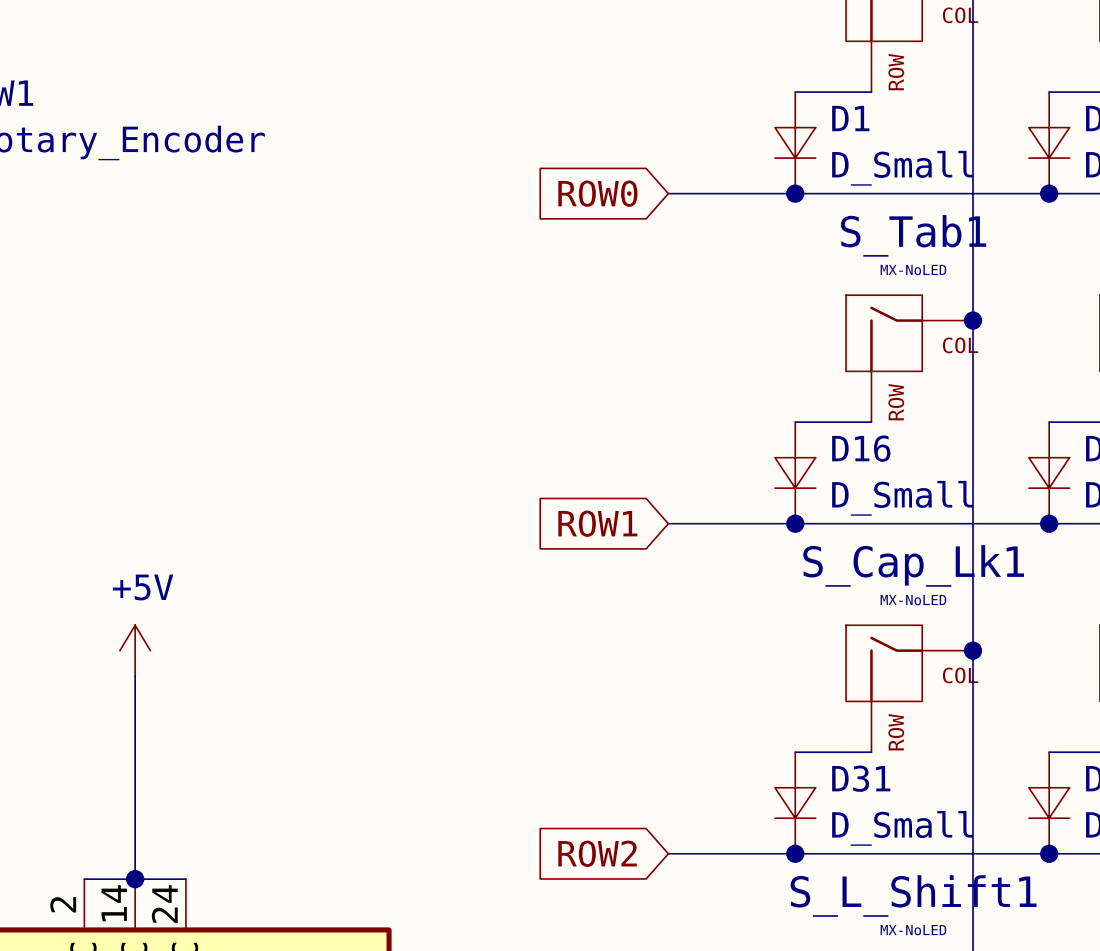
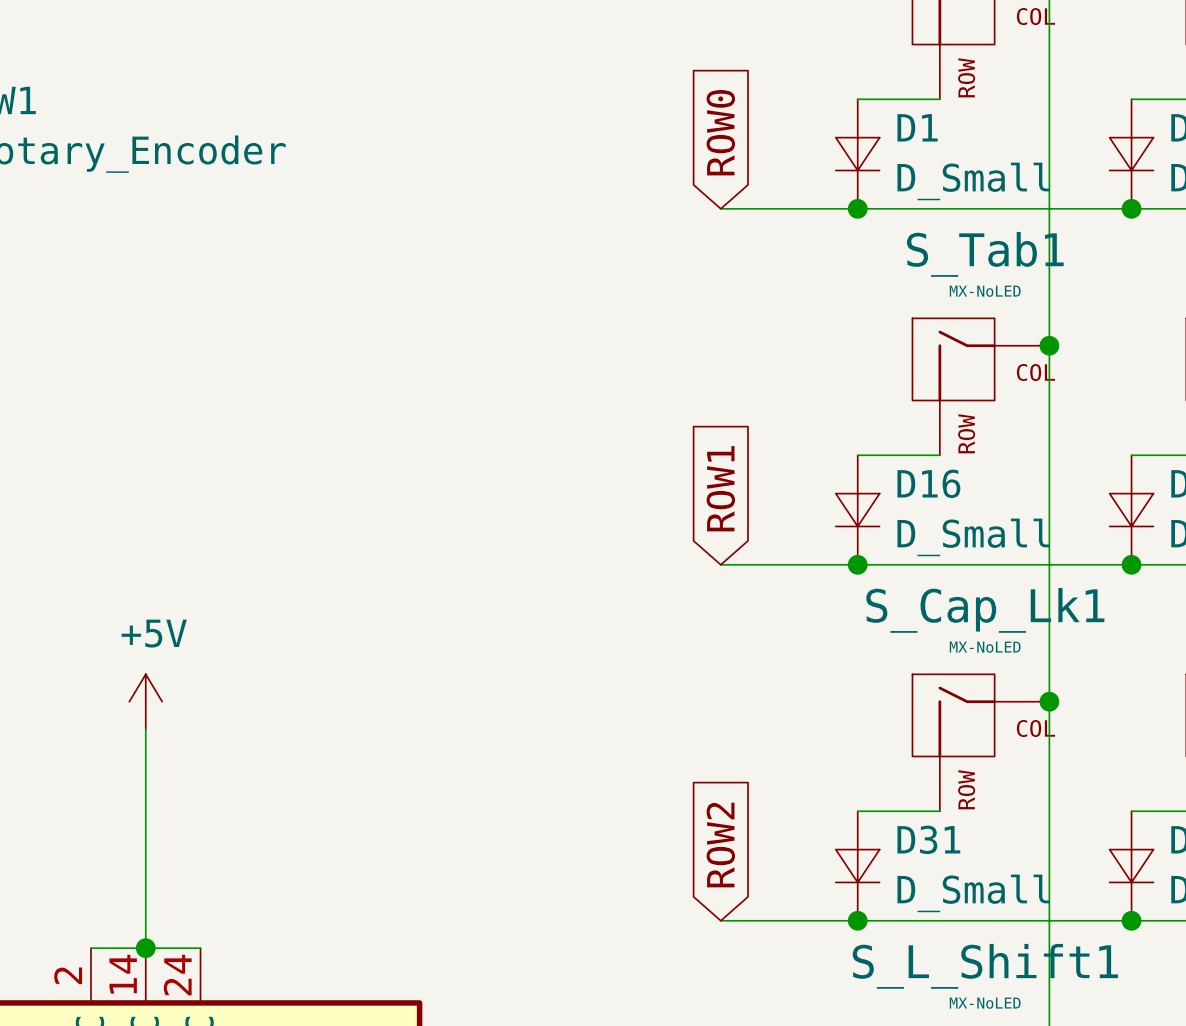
global label rotation: 0° (597, 193) -> 90° clockwise (720, 132)
global label rotation: 0° (597, 523) -> 90° clockwise (720, 488)
global label rotation: 0° (597, 853) -> 90° clockwise (720, 845)

